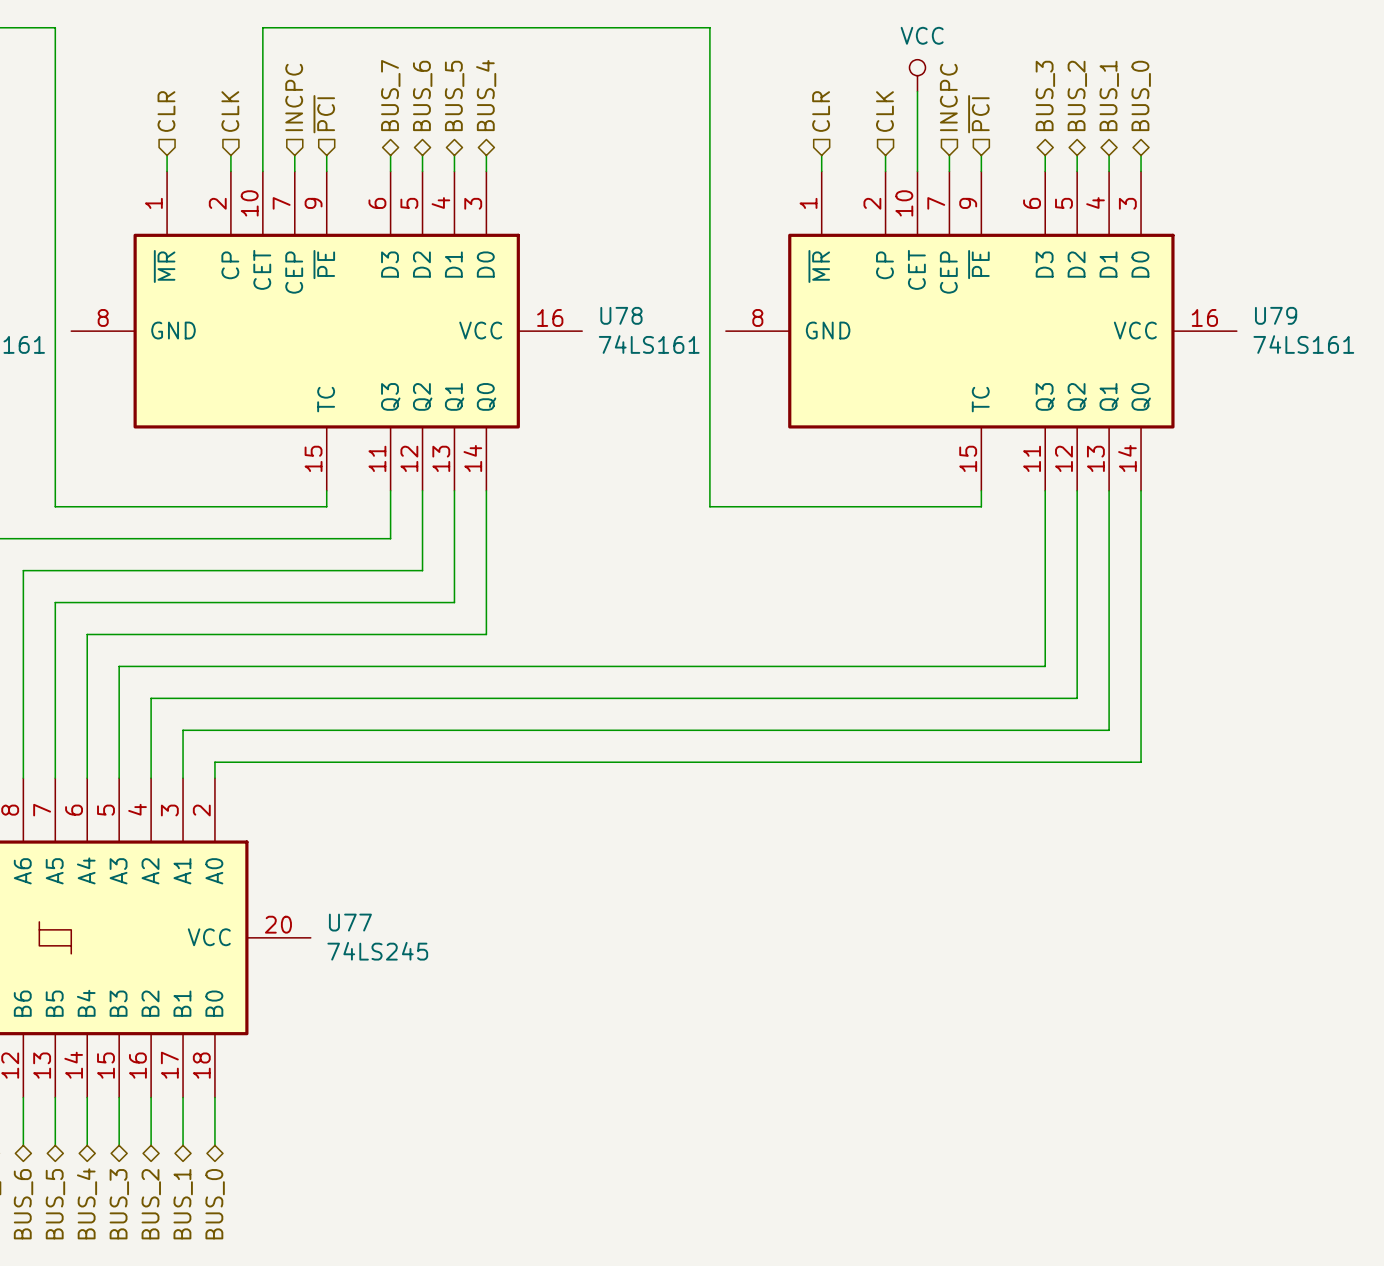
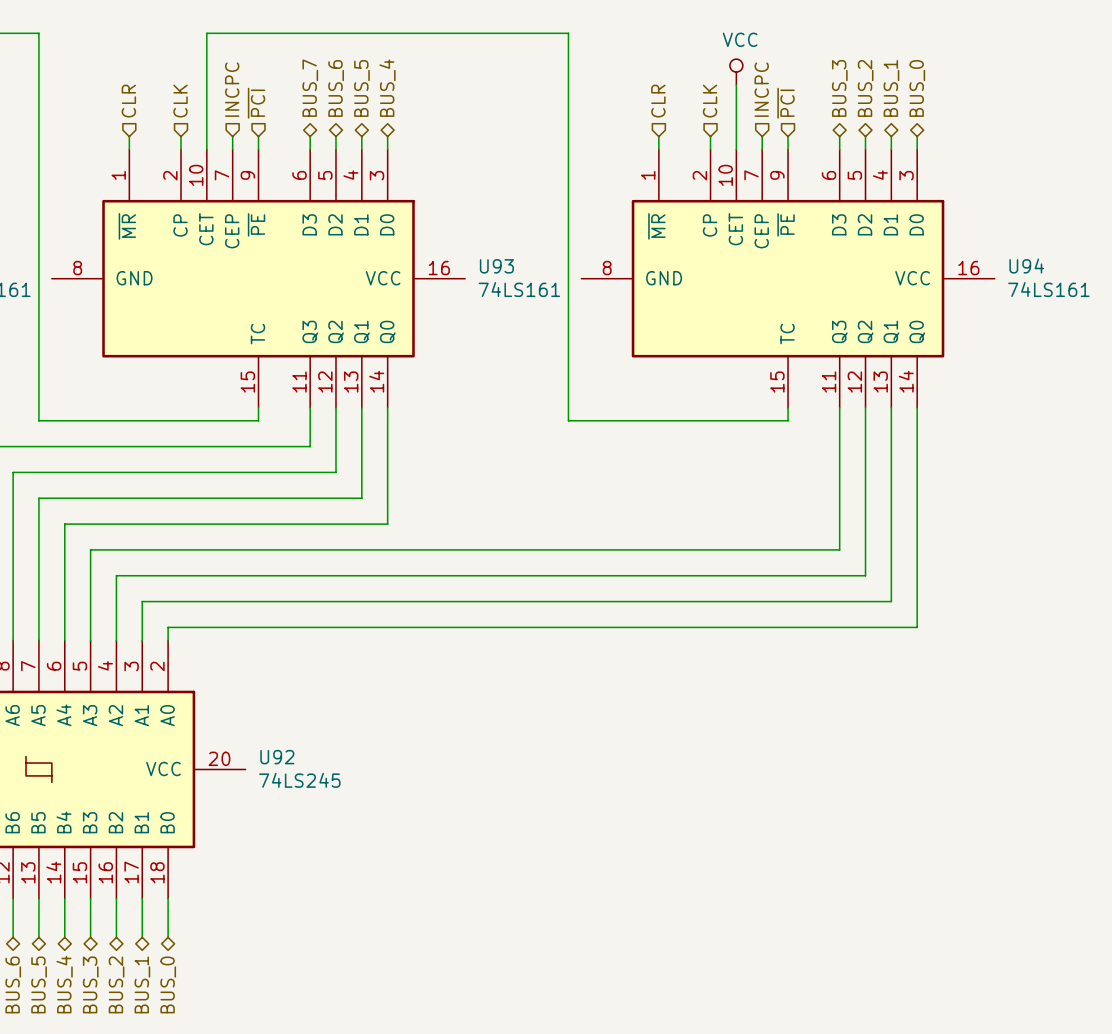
U78 name: U78 (621, 315) -> U93 (496, 266)
U79 name: U79 (1276, 315) -> U94 (1026, 266)
U77 name: U77 (350, 922) -> U92 (277, 757)

